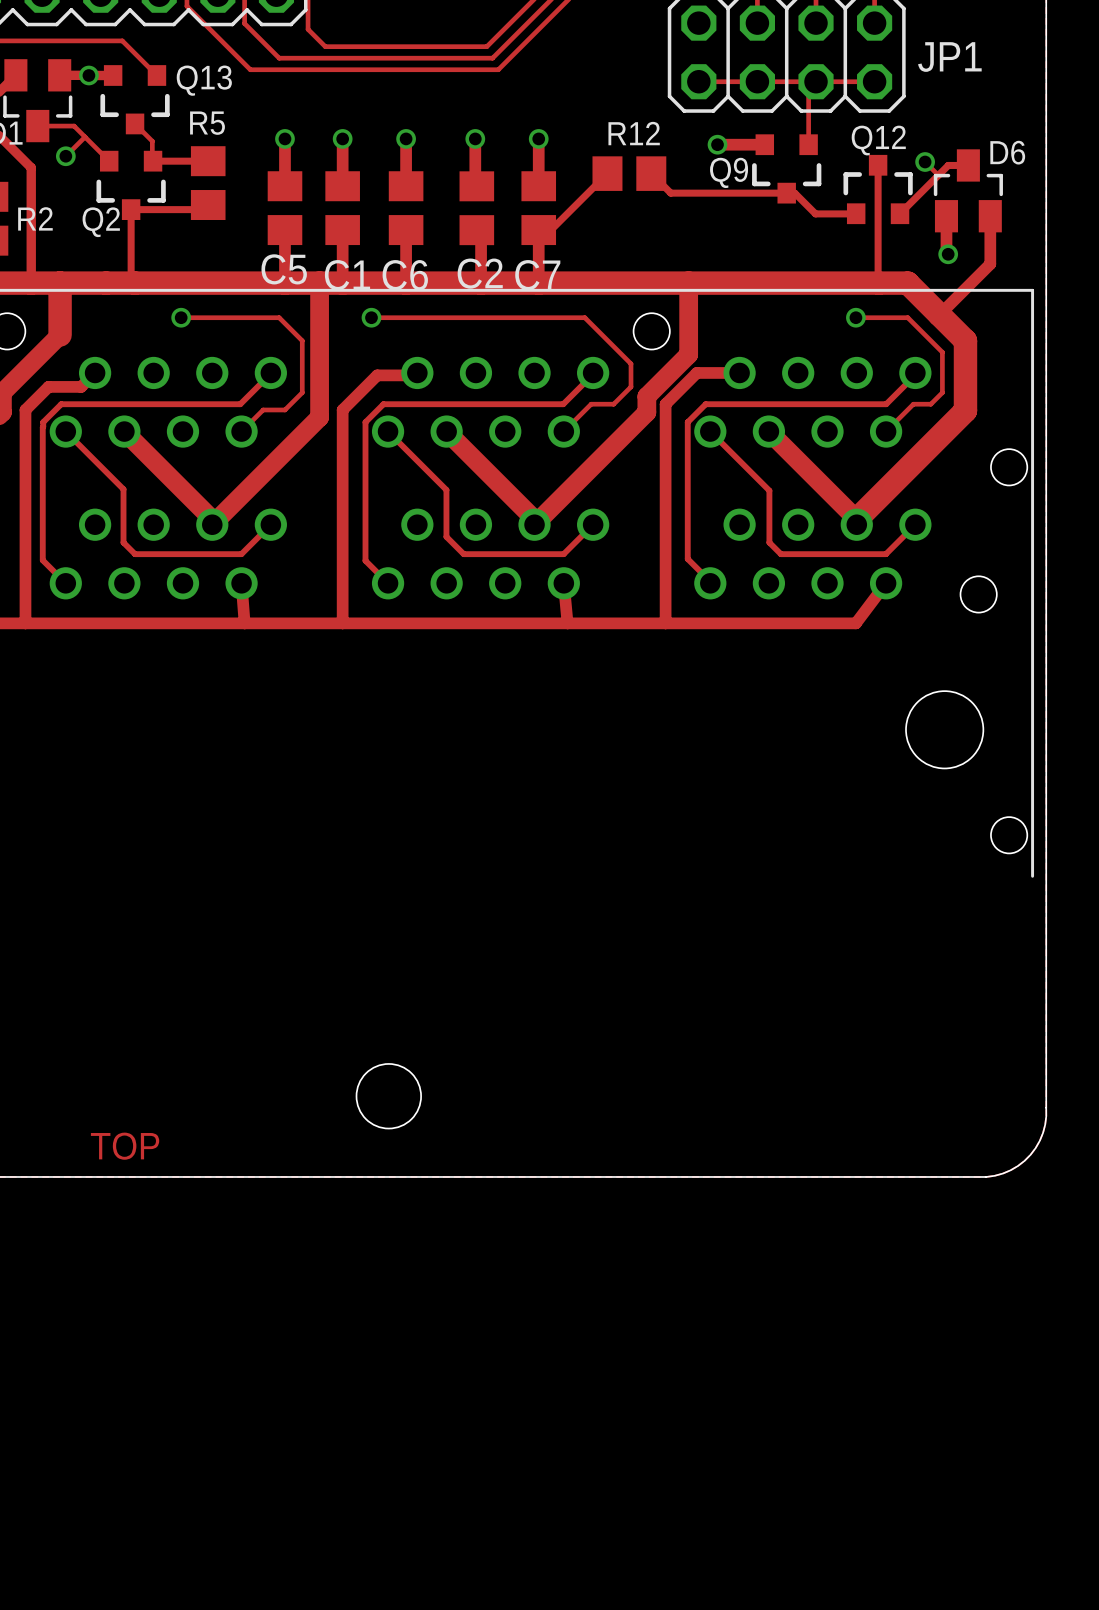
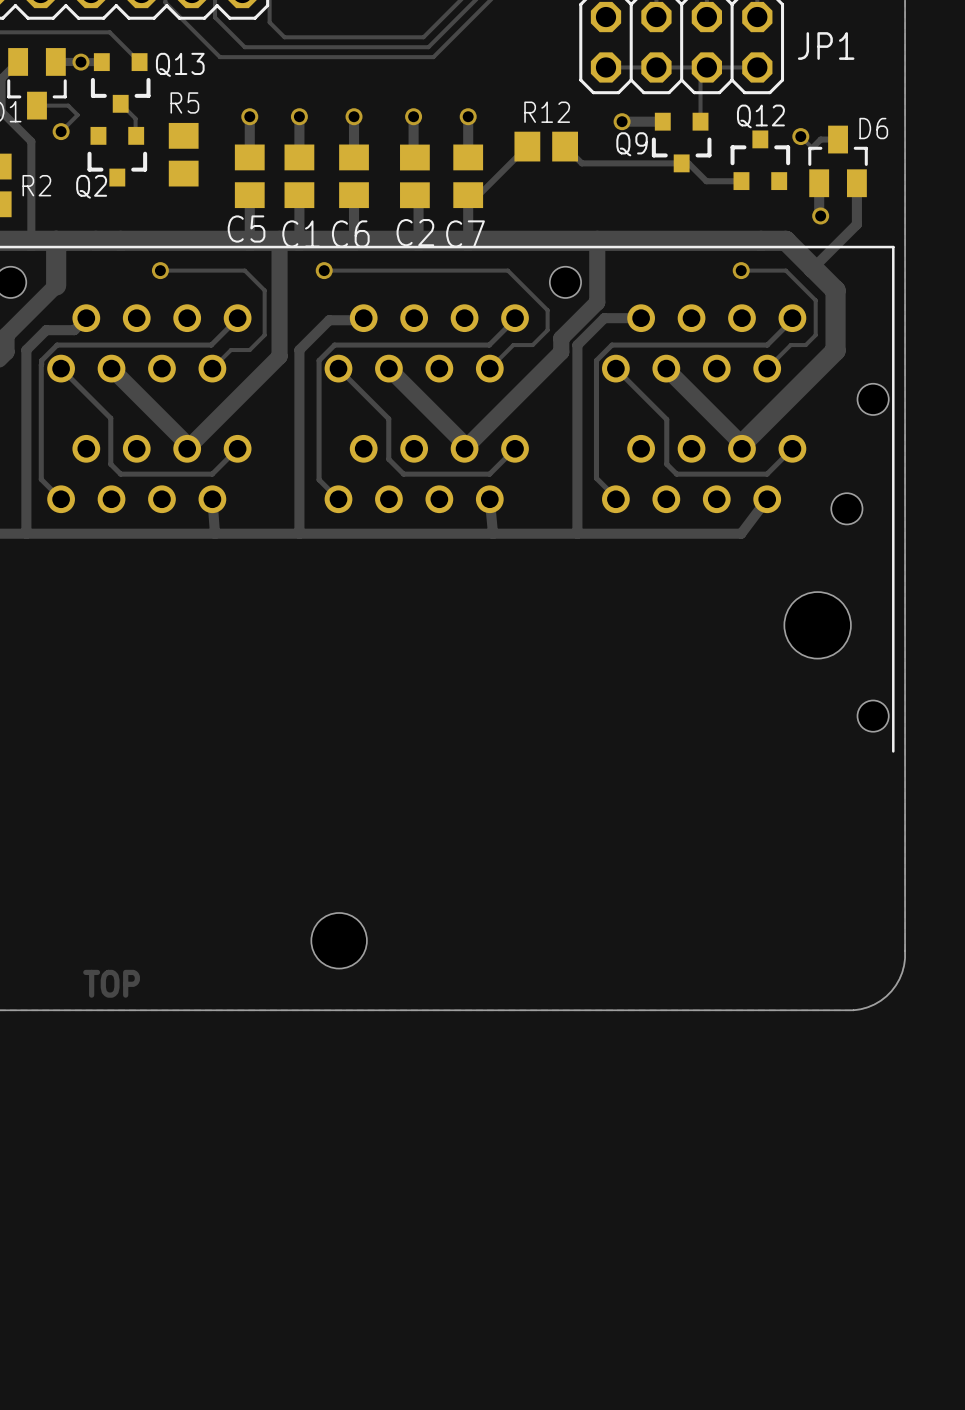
track: (85, 137) (109, 161) -> none
track: (152, 160) (208, 161) -> none
track: (878, 165) (878, 282) -> none
track: (938, 175) (900, 213) -> none
track: (203, 209) (131, 209) (131, 279) -> none

